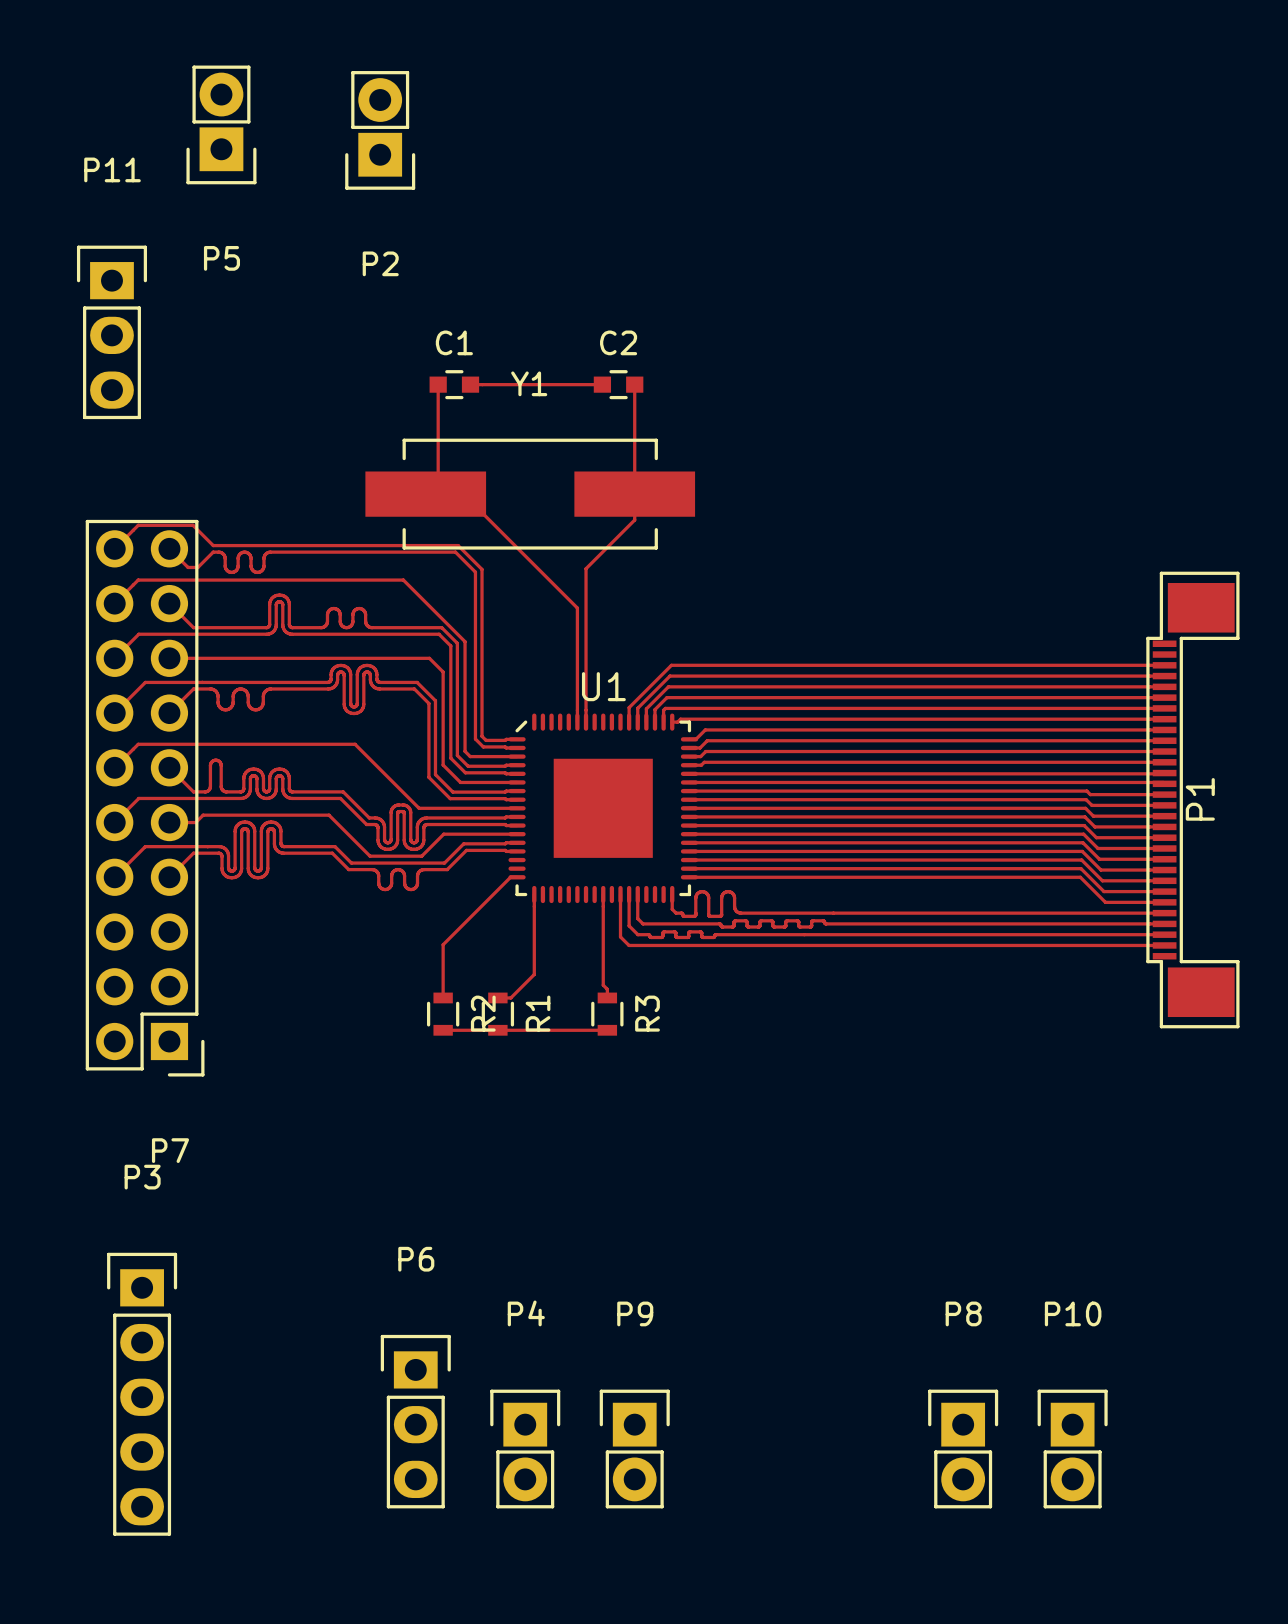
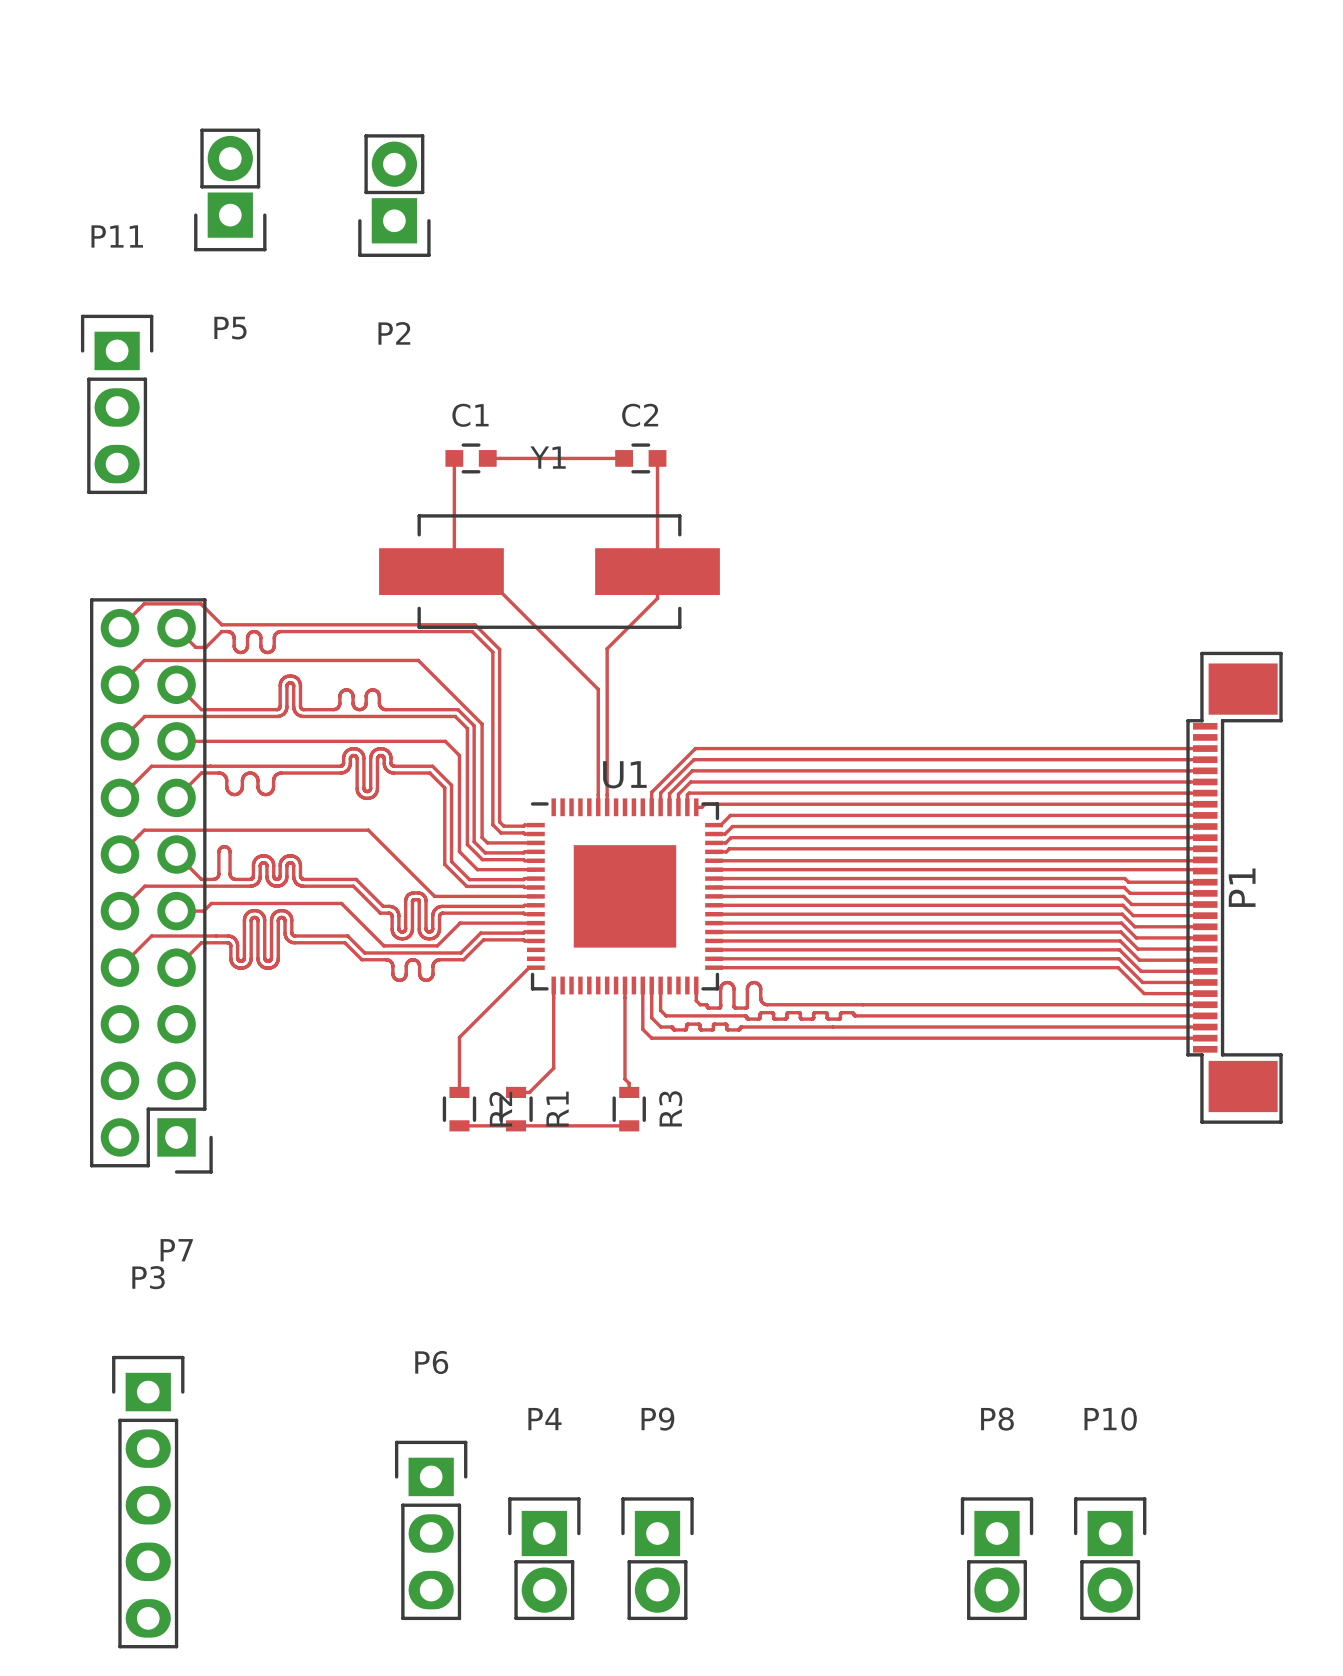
U1 footprint: [508, 713, 699, 904] -> [526, 798, 724, 995]

